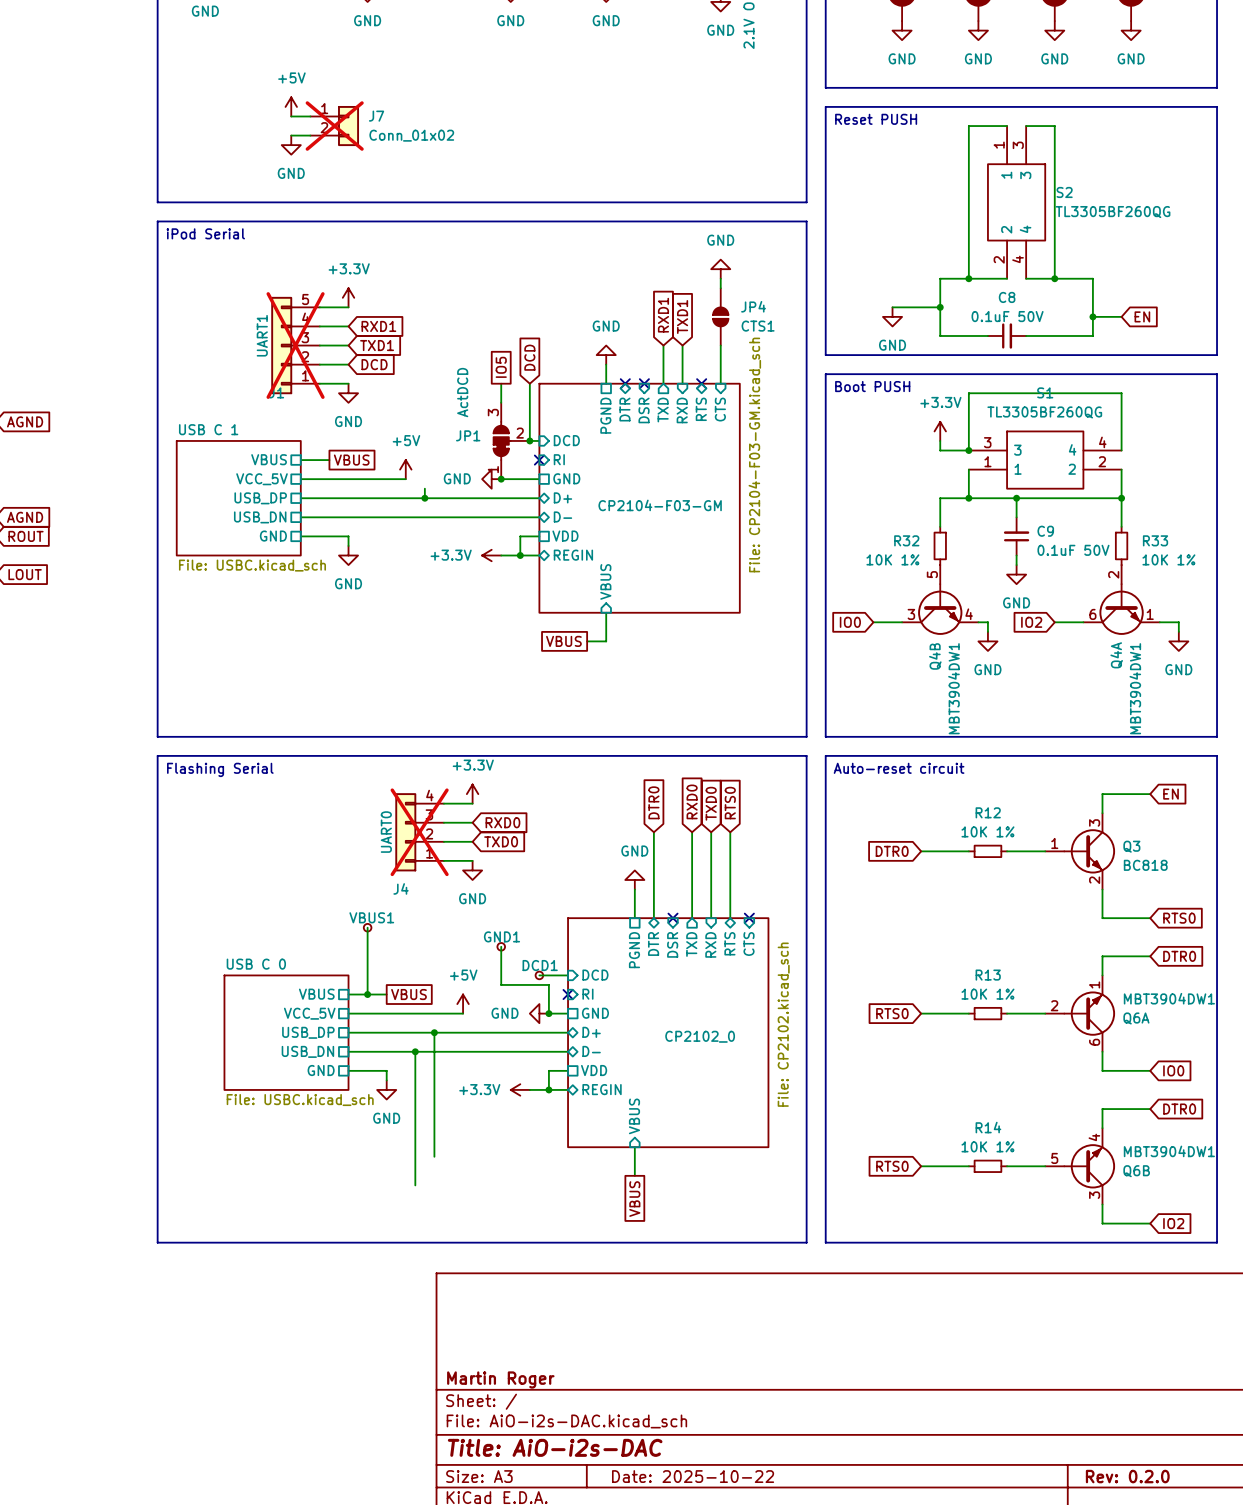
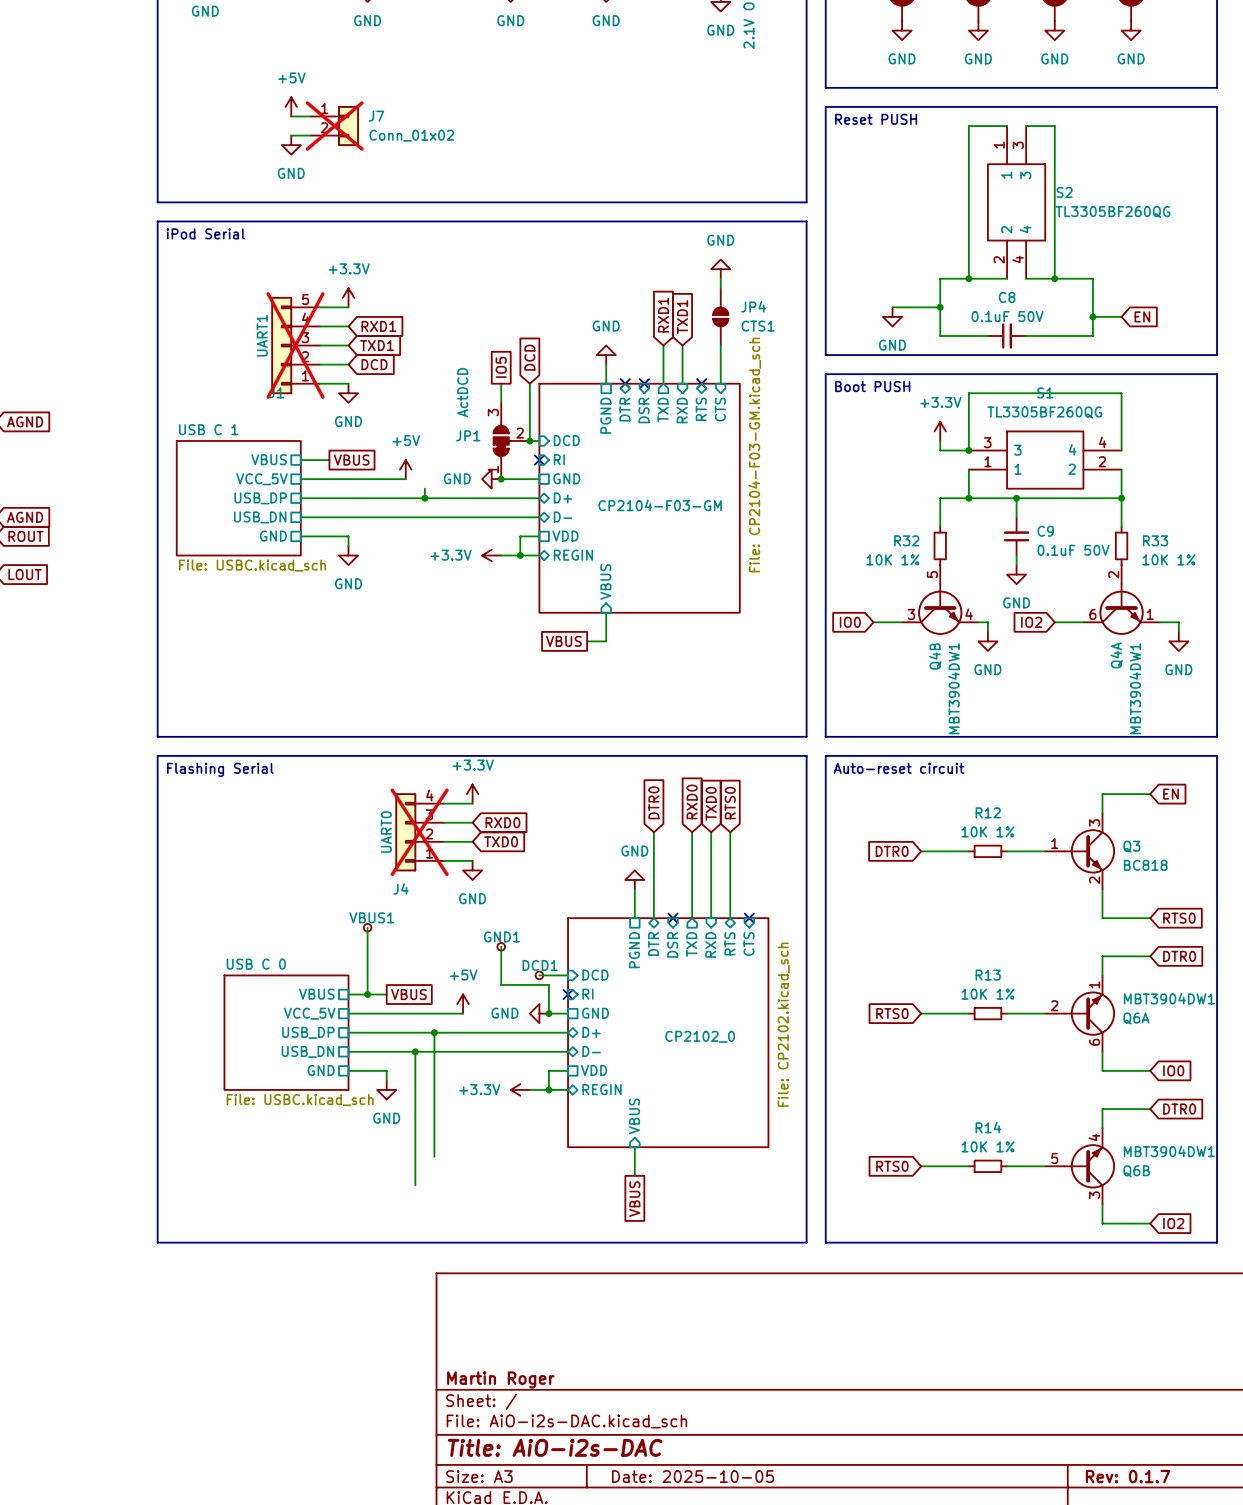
title block: Date: 2025-10-22 (693, 1476) -> Date: 2025-10-05 (693, 1476)
title block: Rev: 0.2.0 (1127, 1476) -> Rev: 0.1.7 (1128, 1476)

